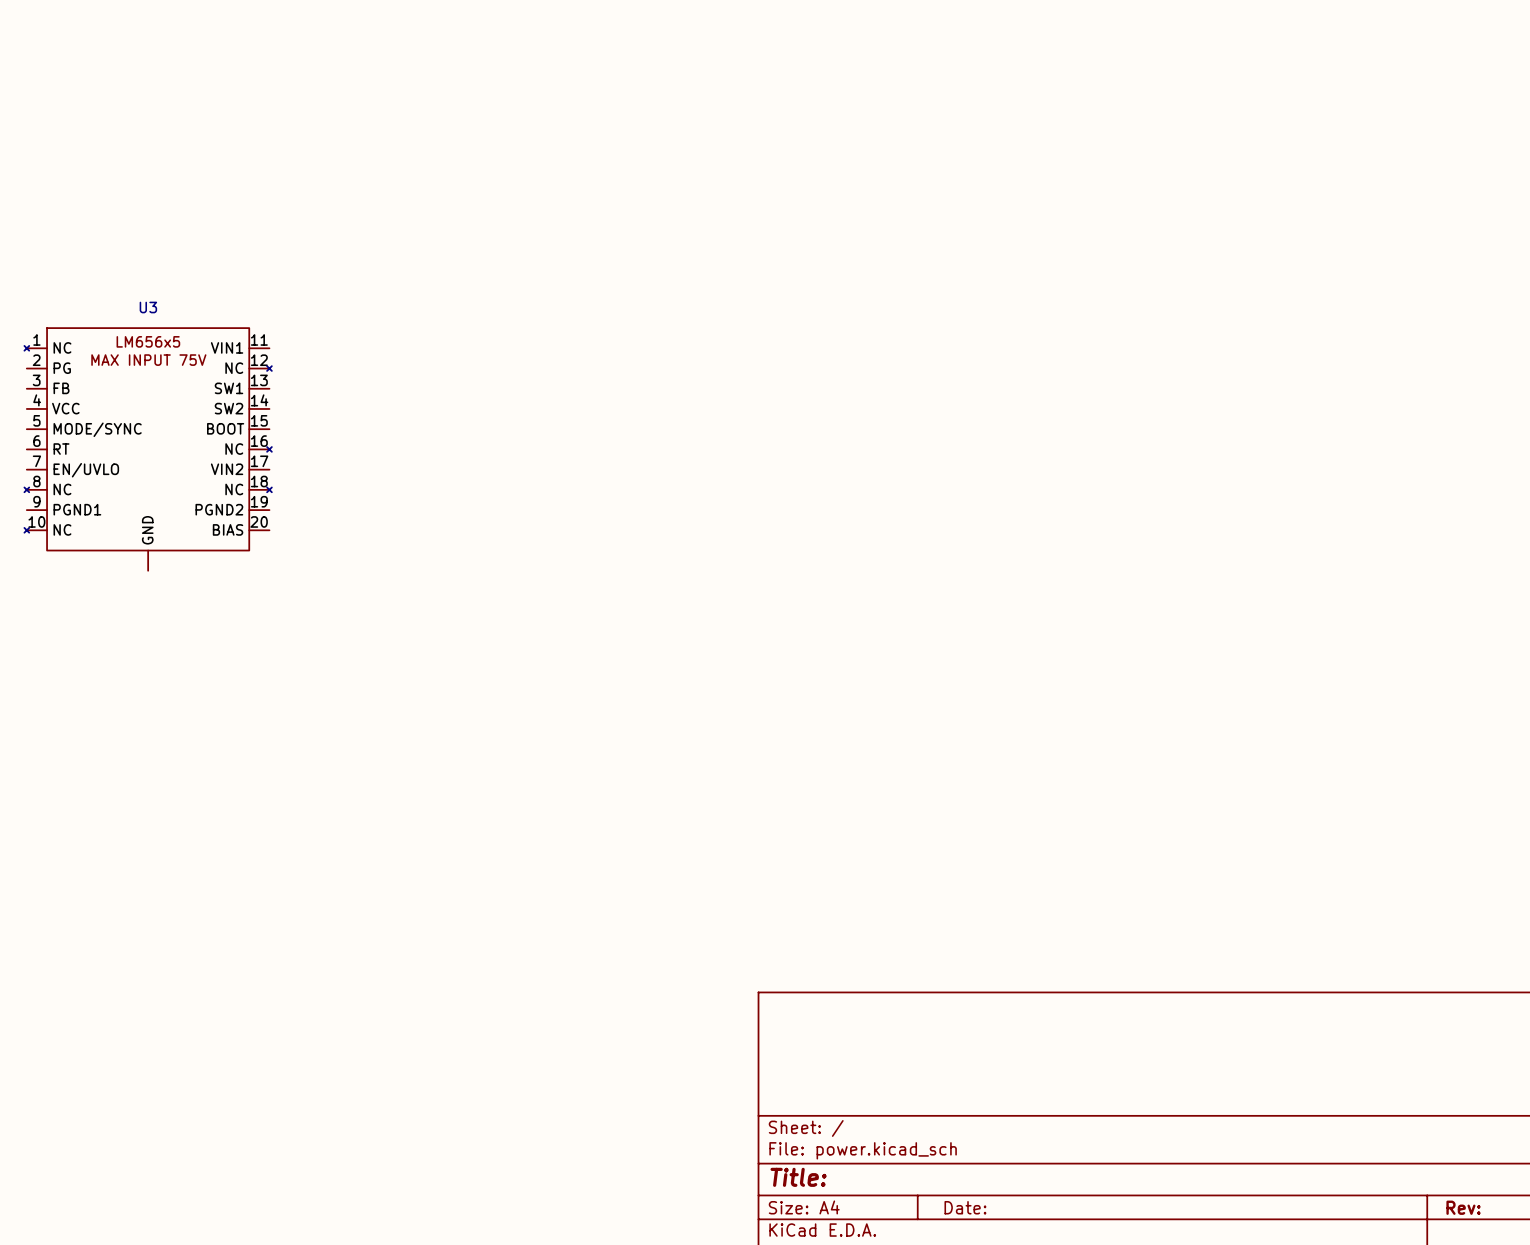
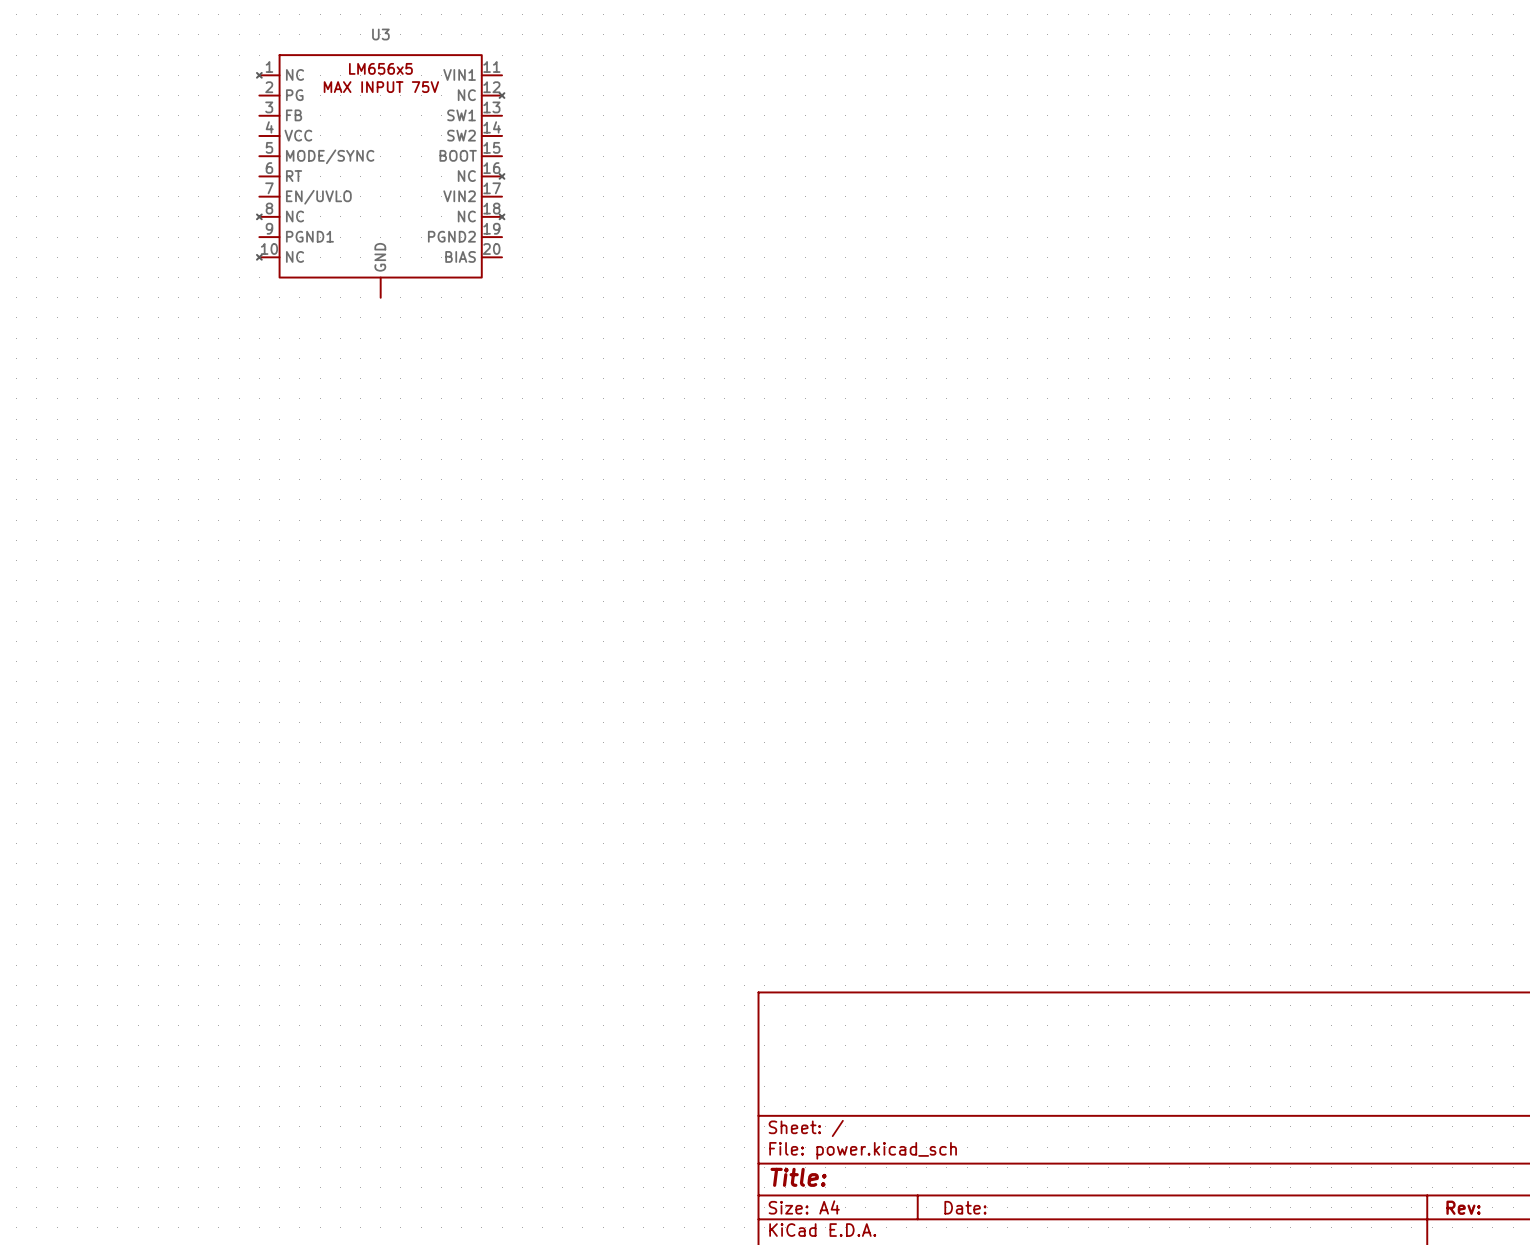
U3 position: (148, 449) -> (380, 176)

